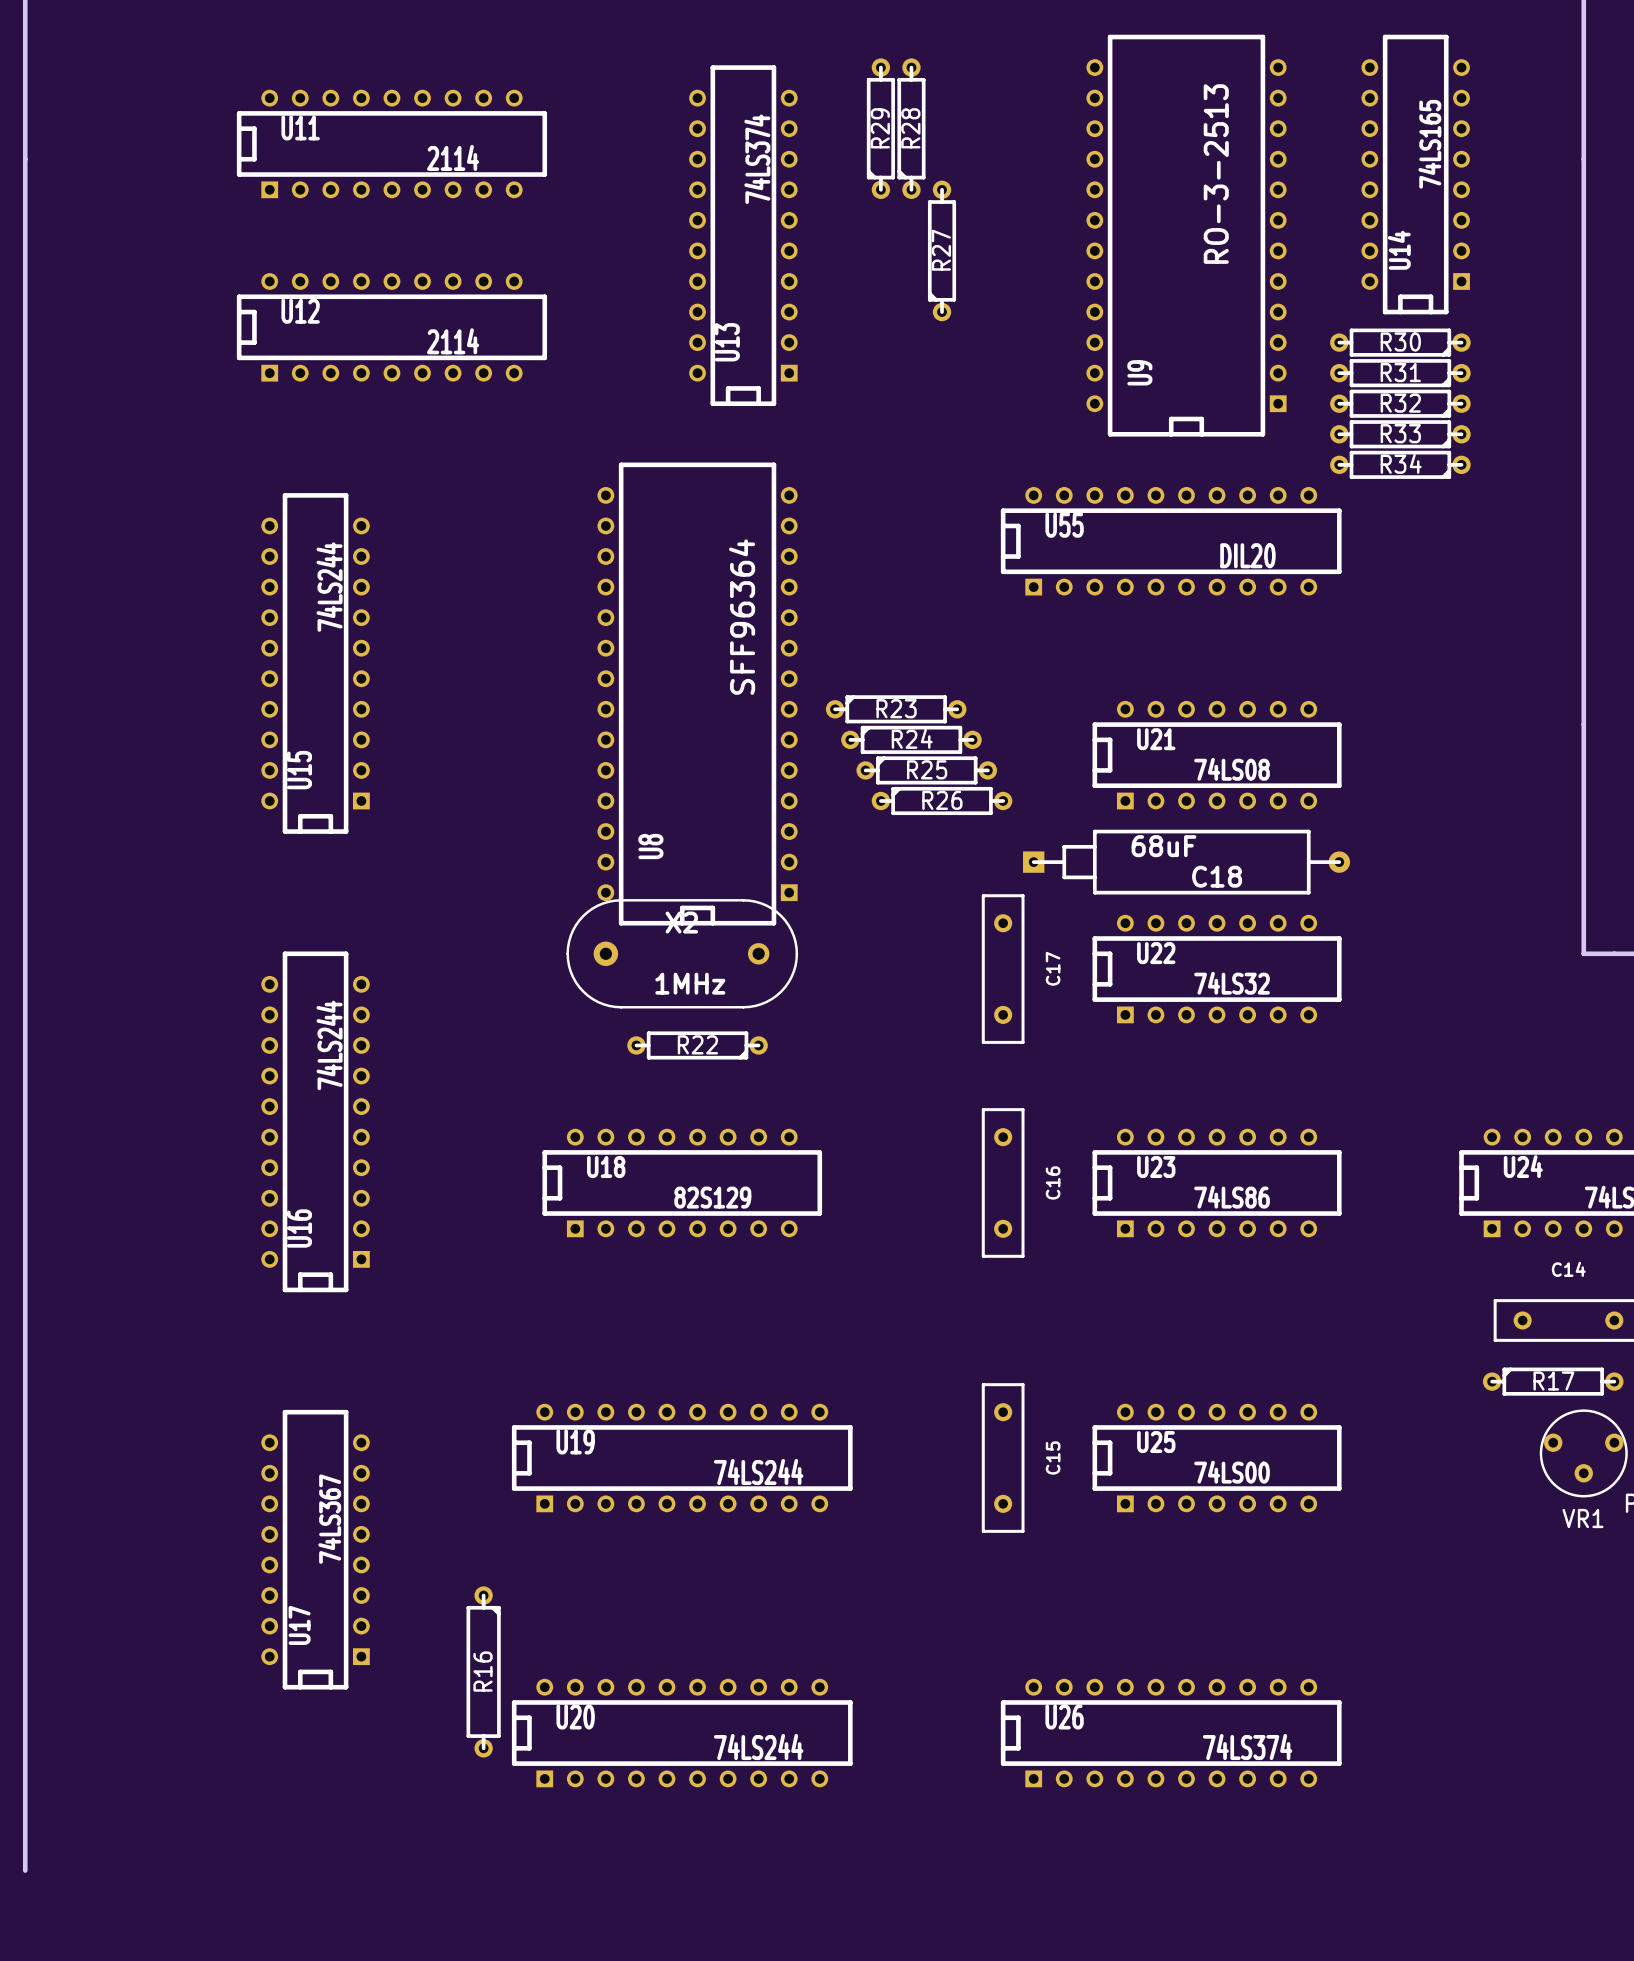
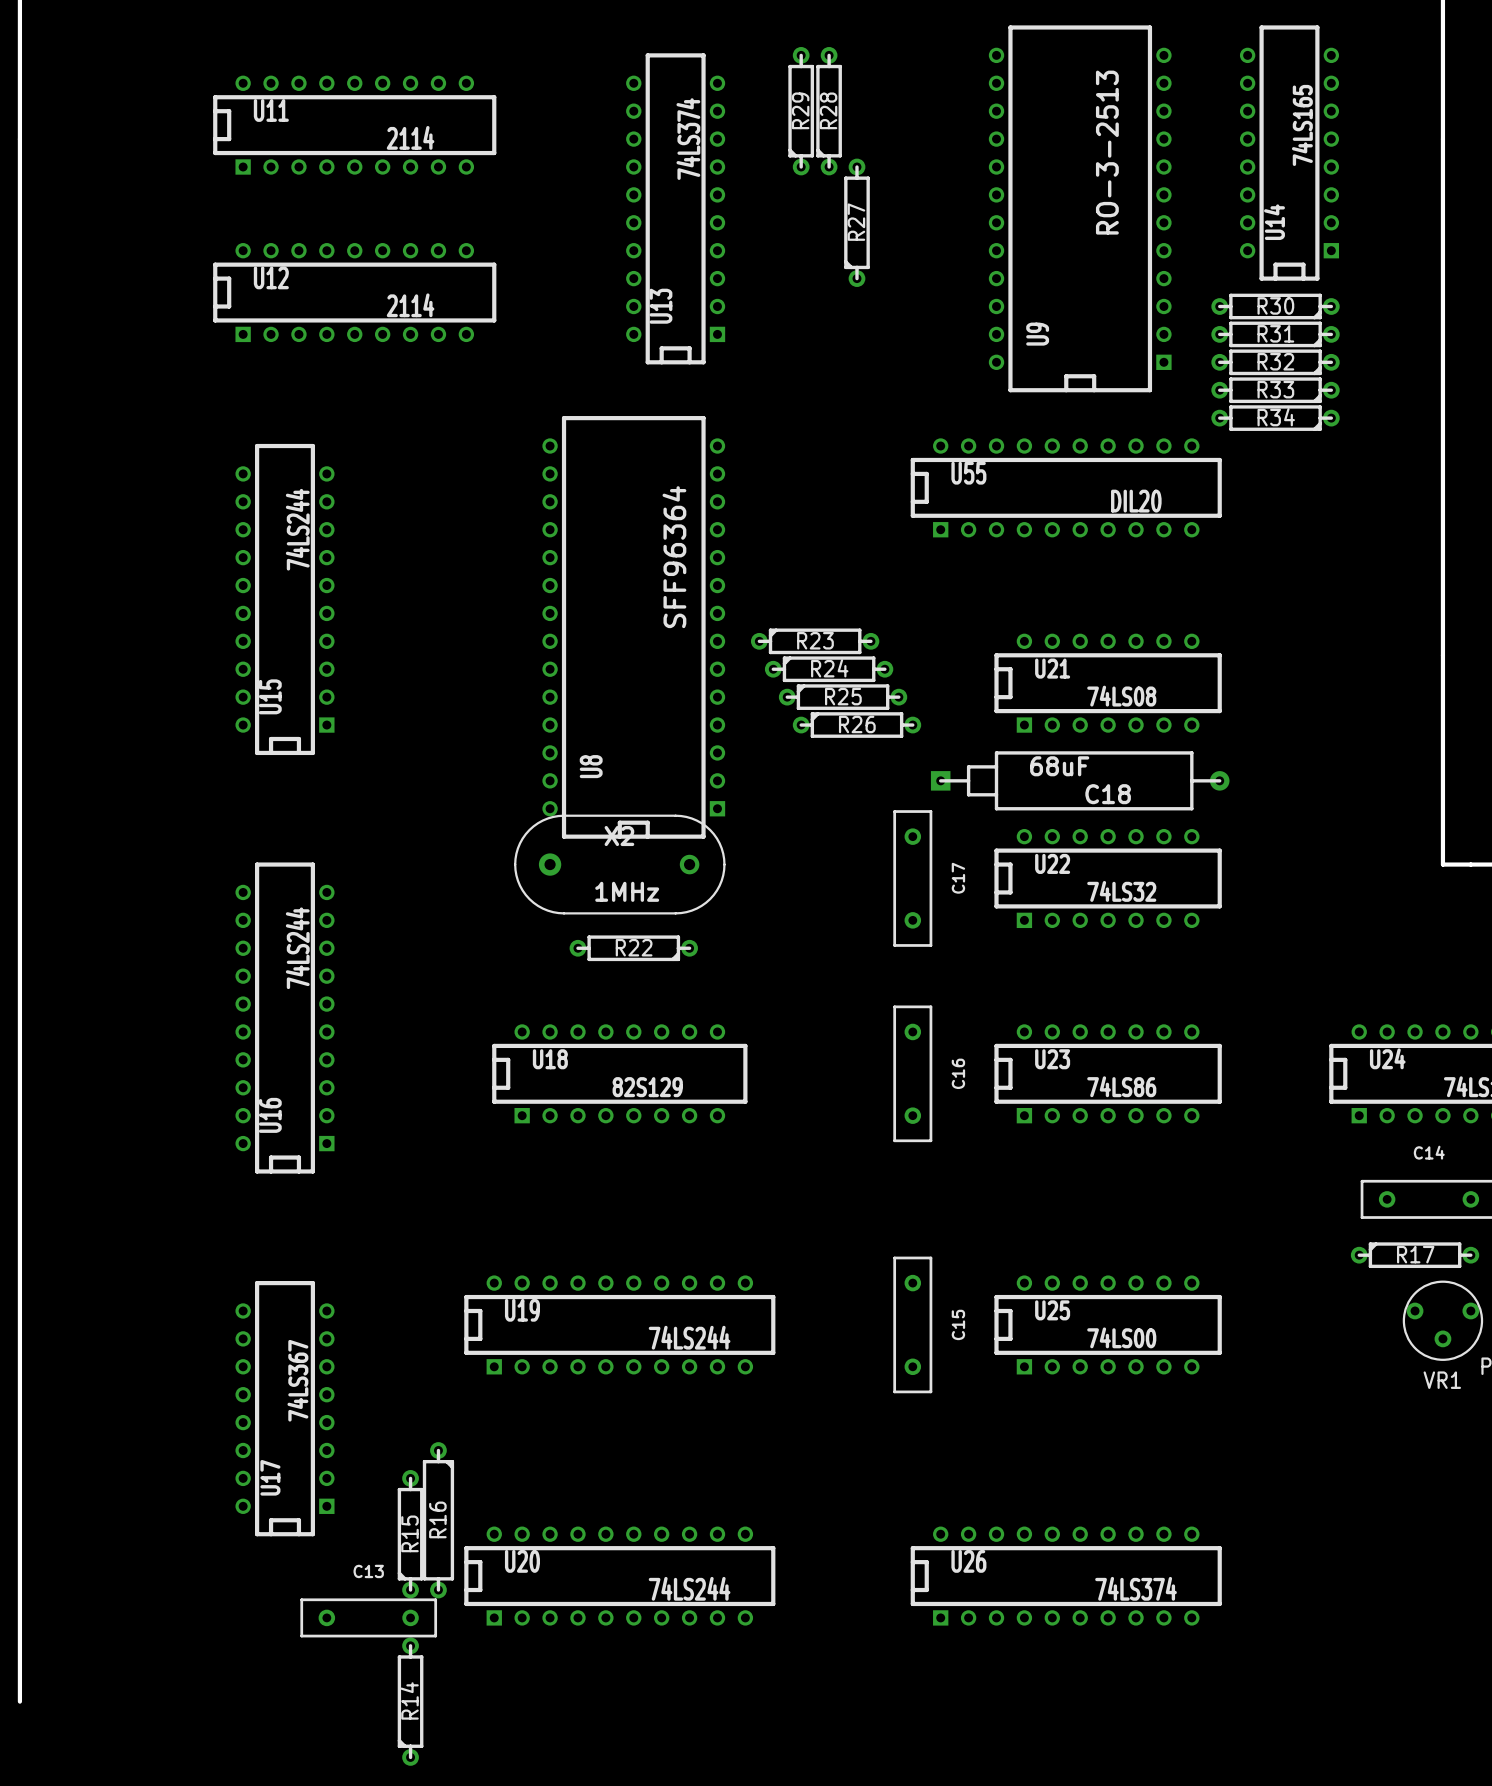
R15: none -> (410, 1534)
C13: none -> (368, 1617)
R14: none -> (410, 1701)

